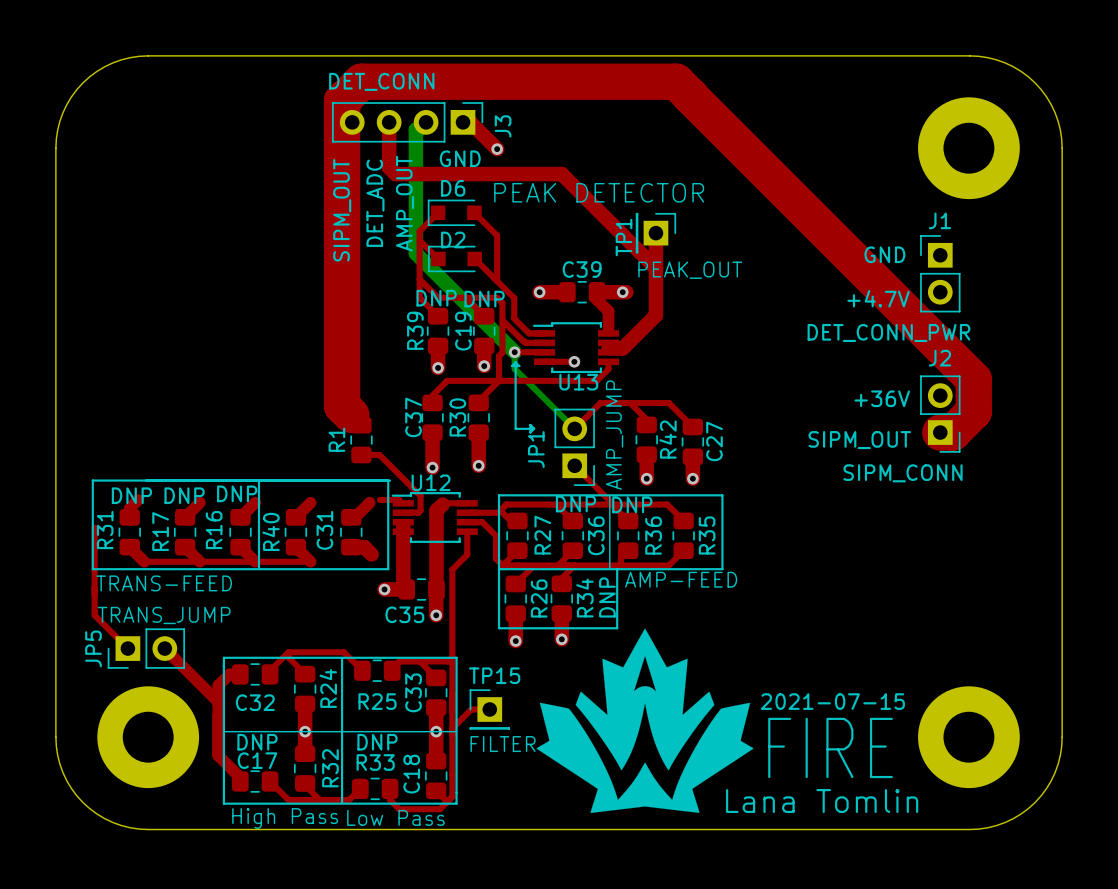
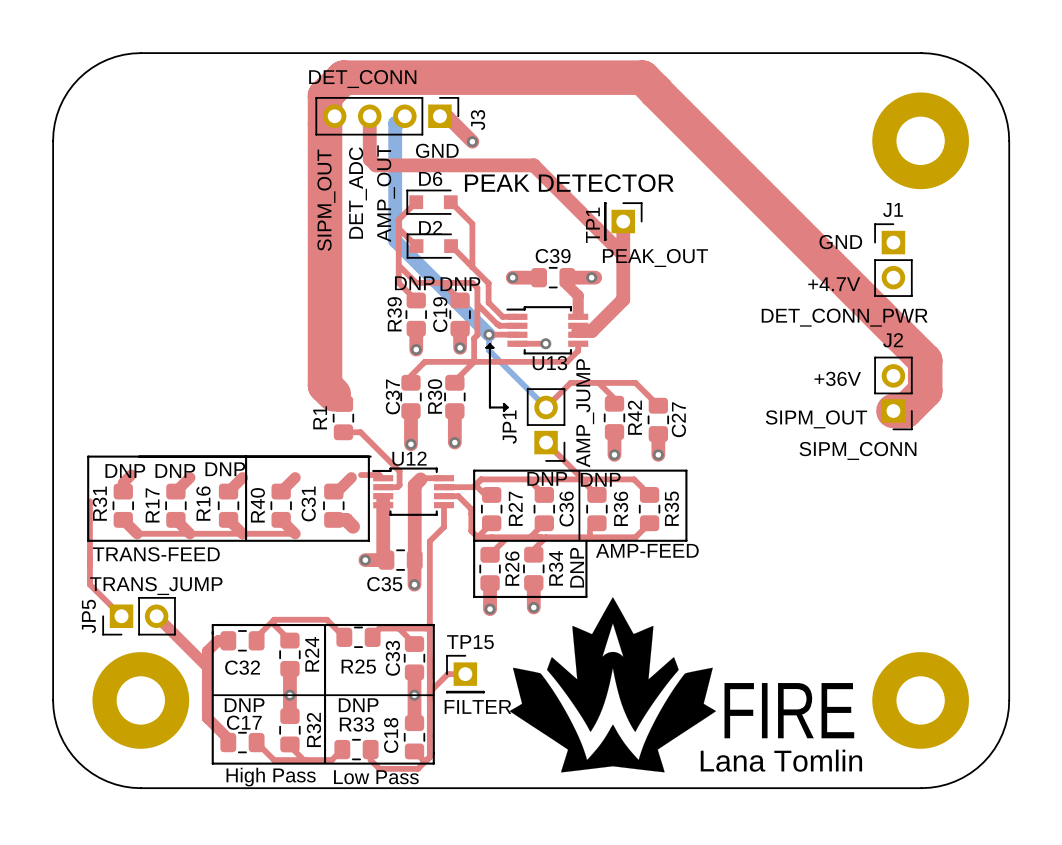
text: 2021-07-15 (832, 701) -> none

